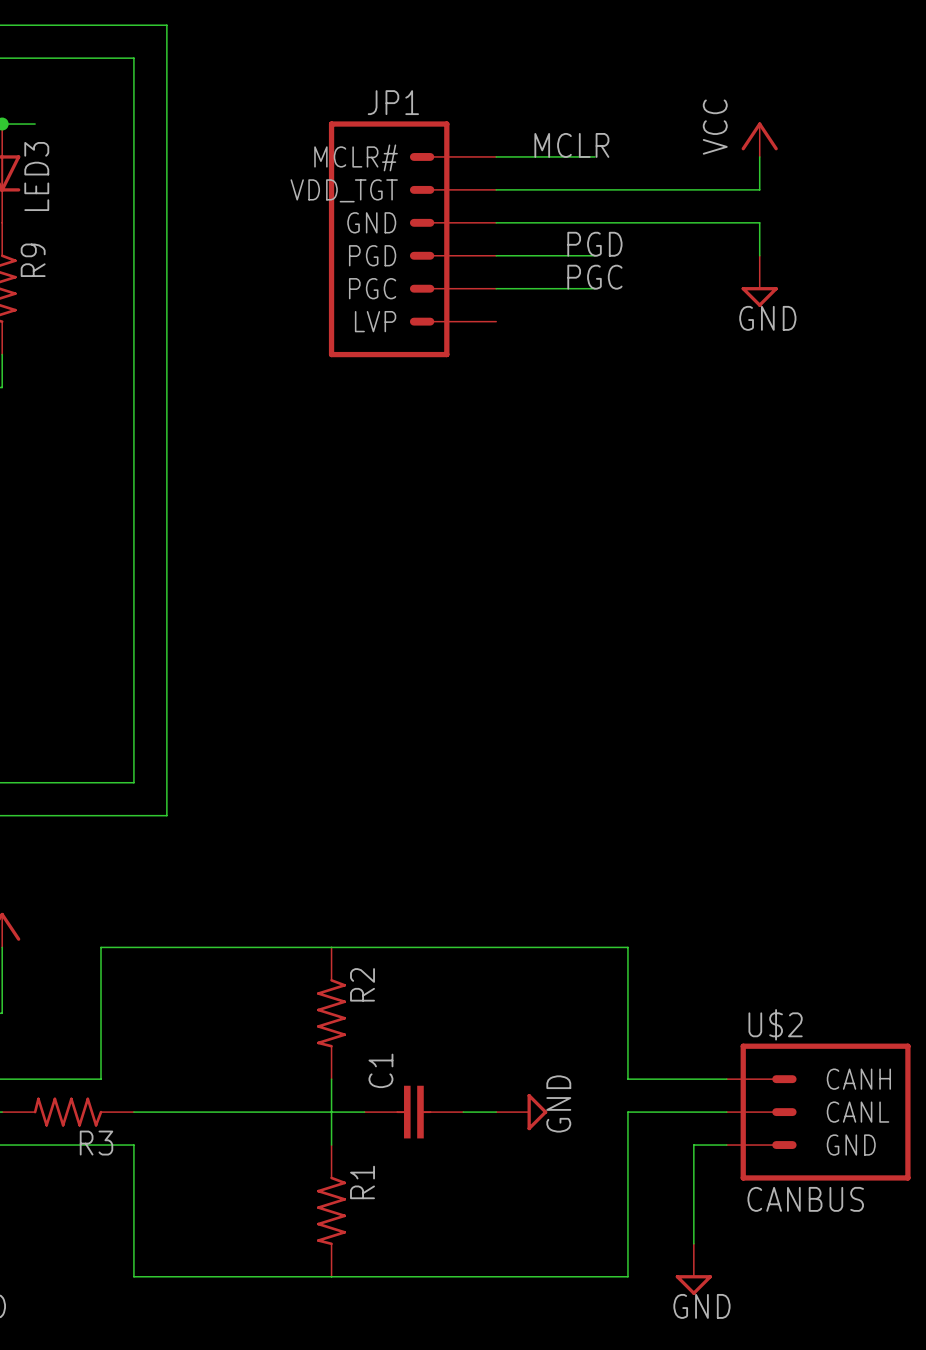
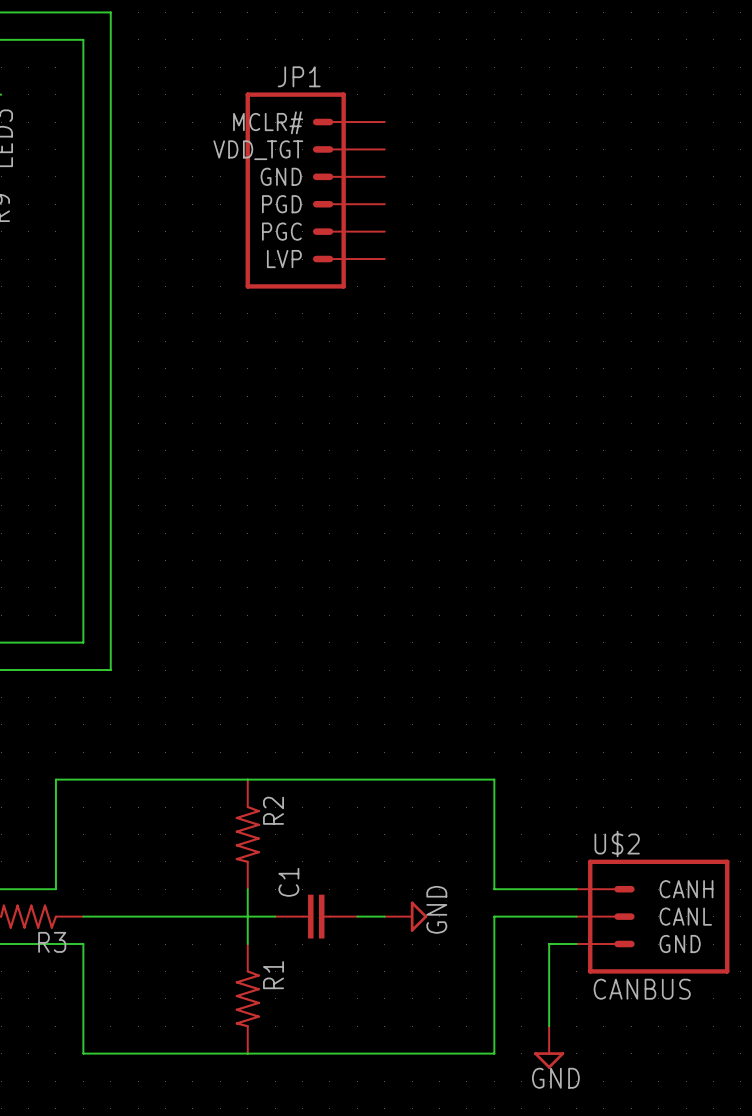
power symbol: VCC (759, 139) -> none
label: MCLR (571, 145) -> none
wire: (496, 156) (595, 156) -> none
wire: (759, 156) (759, 189) (496, 189) -> none
wire: (496, 222) (759, 222) (759, 255) -> none
label: PGD (594, 244) -> none
wire: (496, 255) (595, 255) -> none
label: PGC (594, 277) -> none
power symbol: GND (759, 281) -> none
wire: (496, 288) (595, 288) -> none

